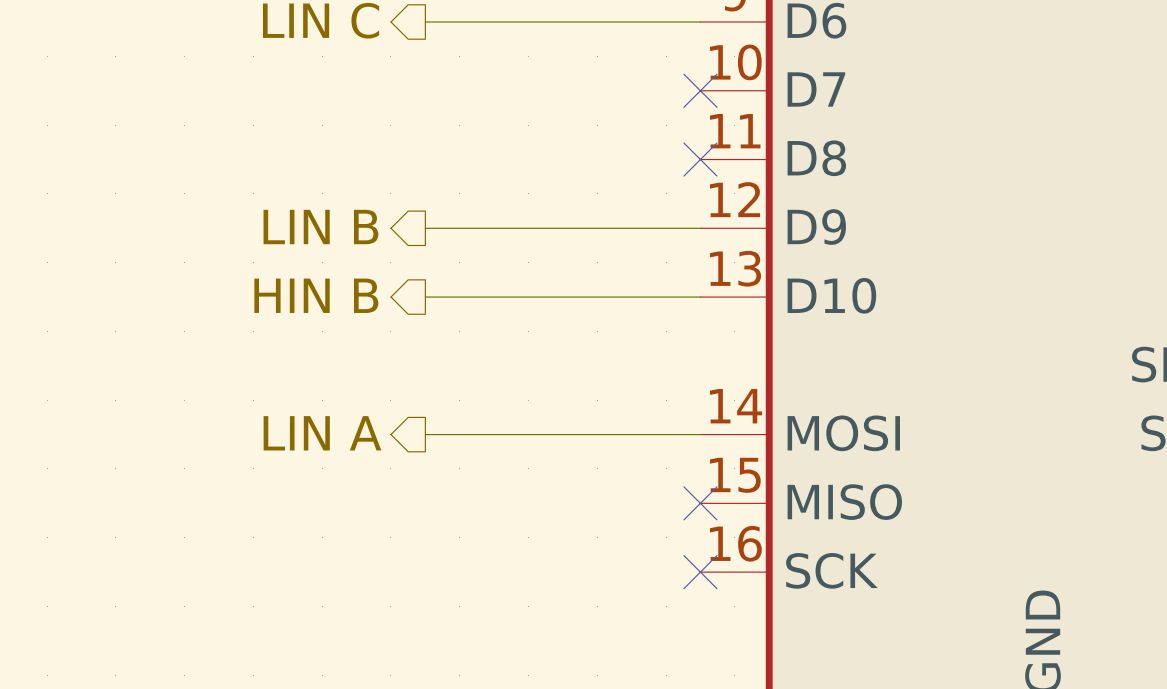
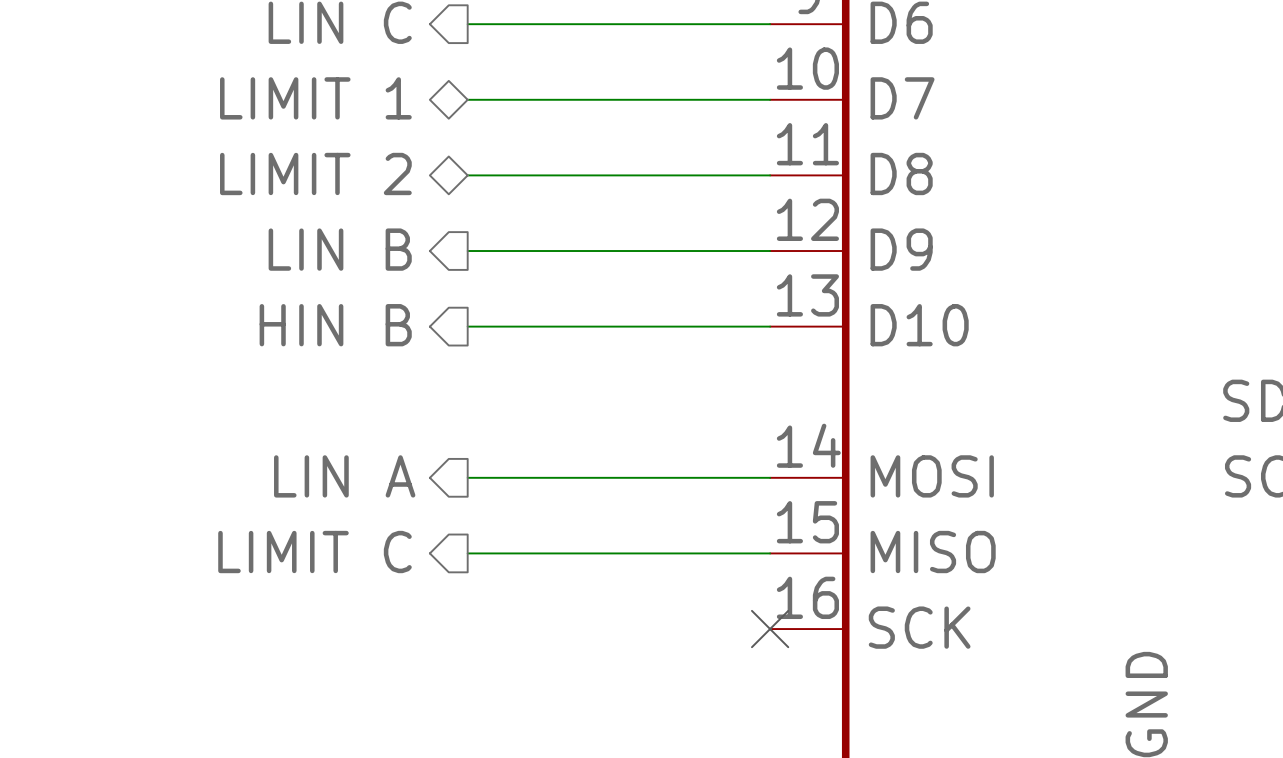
hierarchical label: none -> LIMIT 1 (315, 98)
wire: none -> (467, 99) (770, 99)
no-connect mark: (700, 90) -> none
hierarchical label: none -> LIMIT 2 (315, 173)
wire: none -> (467, 175) (770, 175)
no-connect mark: (700, 159) -> none
hierarchical label: none -> LIMIT C (314, 552)
wire: none -> (467, 553) (770, 553)
no-connect mark: (700, 503) -> none

